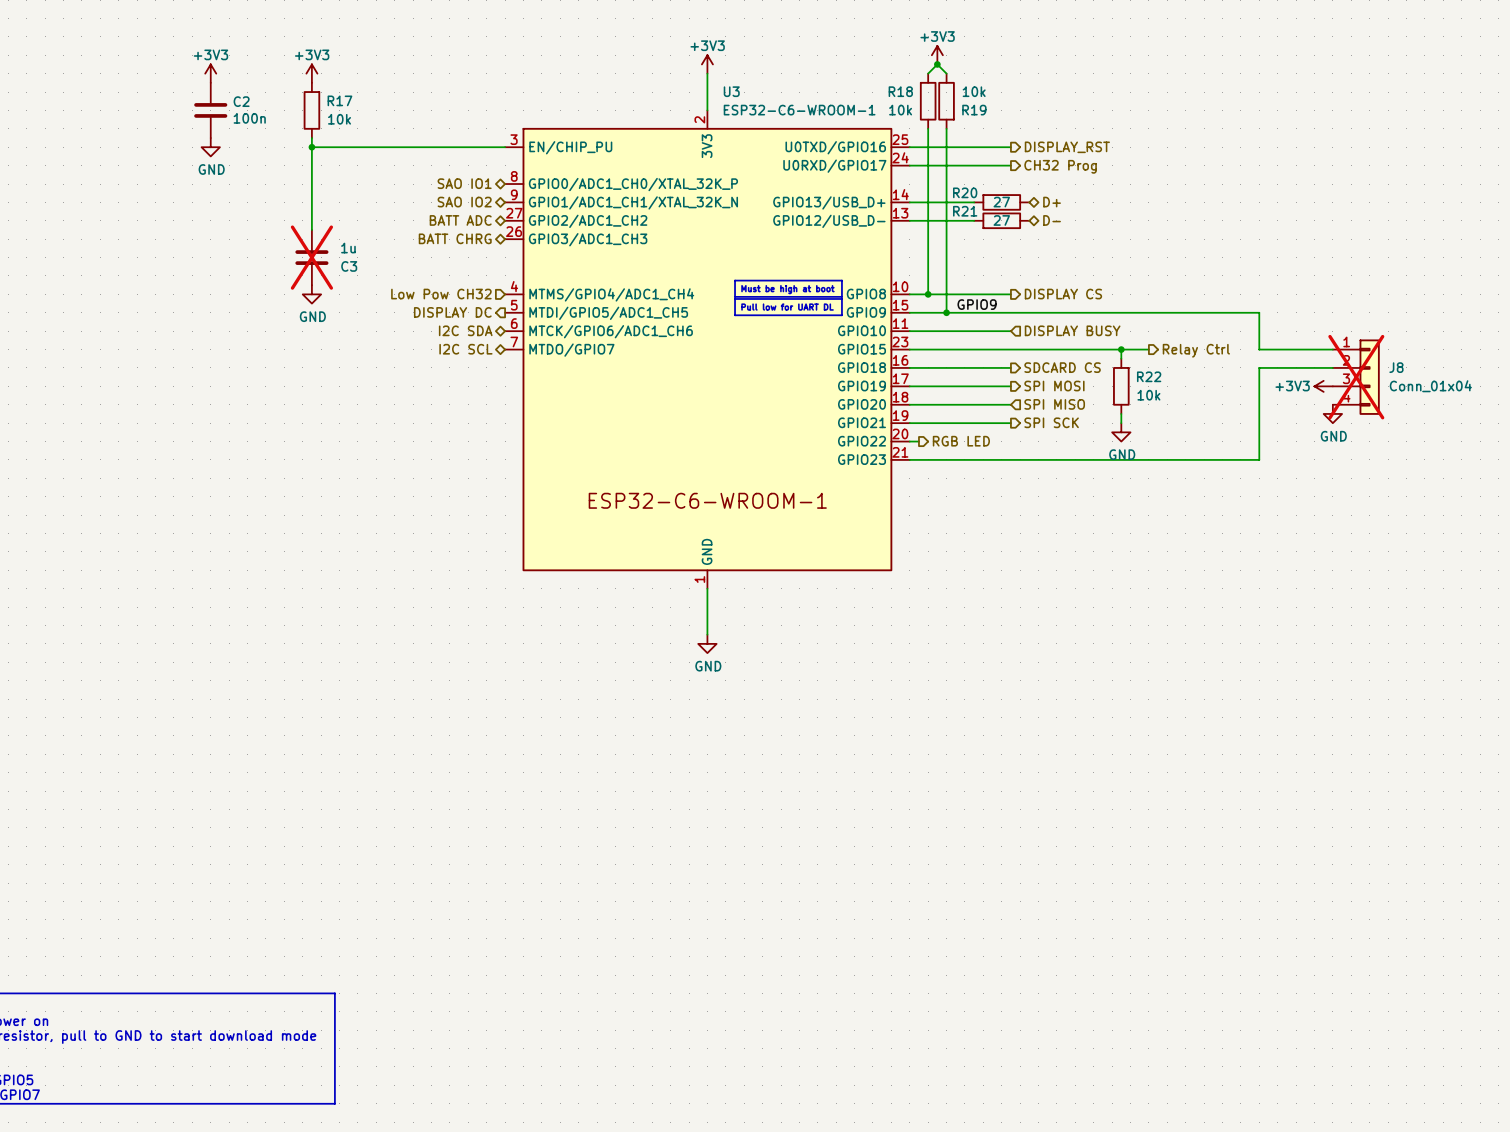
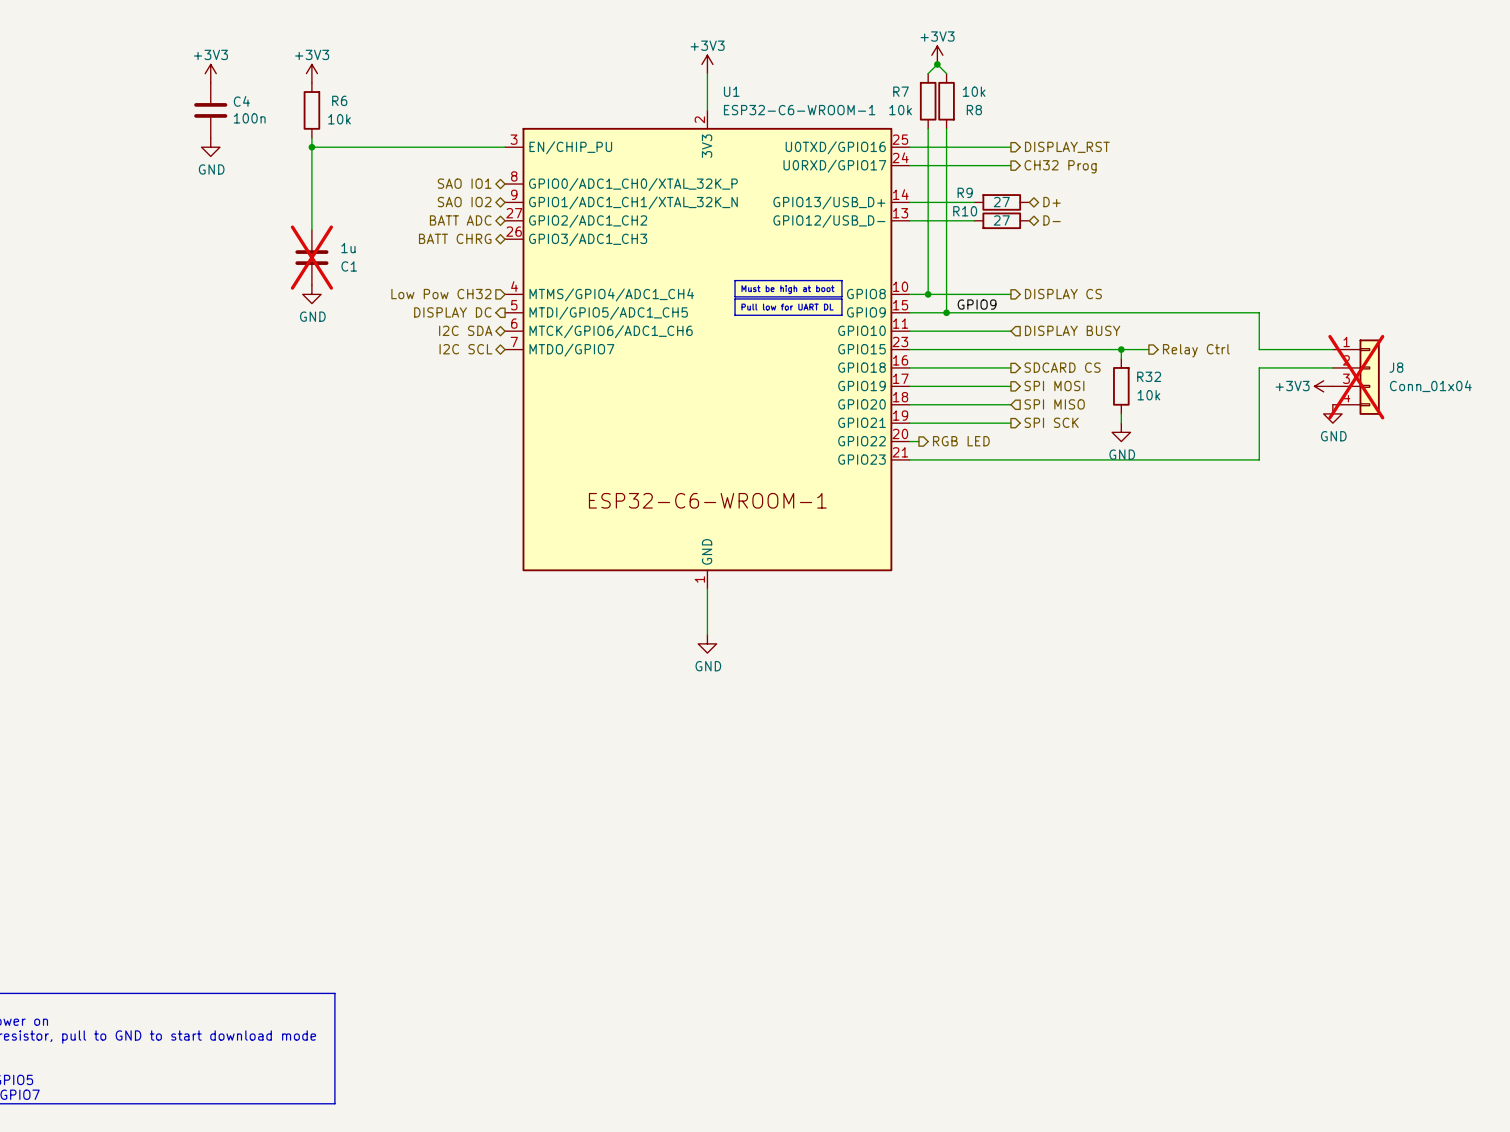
U3 name: U3 (731, 91) -> U1 (731, 91)
R18 name: R18 (900, 91) -> R7 (901, 91)
R17 name: R17 (339, 100) -> R6 (339, 100)
C2 name: C2 (241, 101) -> C4 (241, 101)
R19 name: R19 (974, 110) -> R8 (974, 110)
R20 name: R20 (965, 192) -> R9 (965, 192)
R21 name: R21 (965, 211) -> R10 (965, 211)
C3 name: C3 (349, 266) -> C1 (349, 266)
R22 name: R22 (1149, 376) -> R32 (1149, 376)

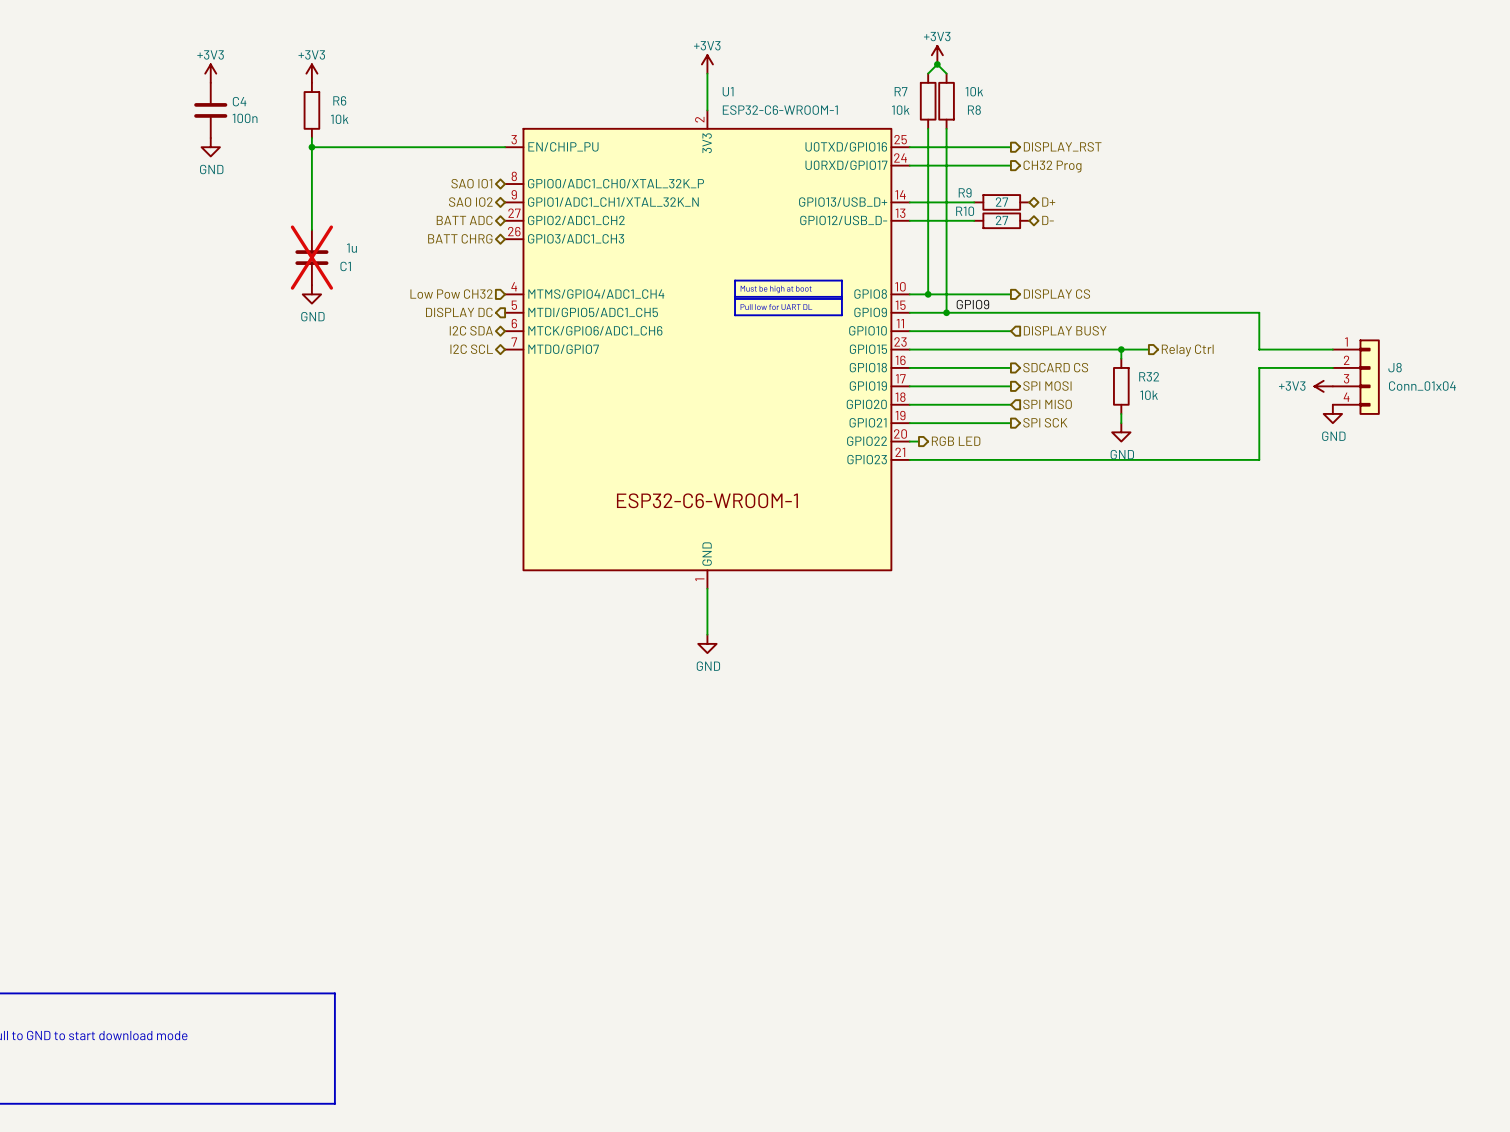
J8 do-not-place cross: (1356, 377) -> none

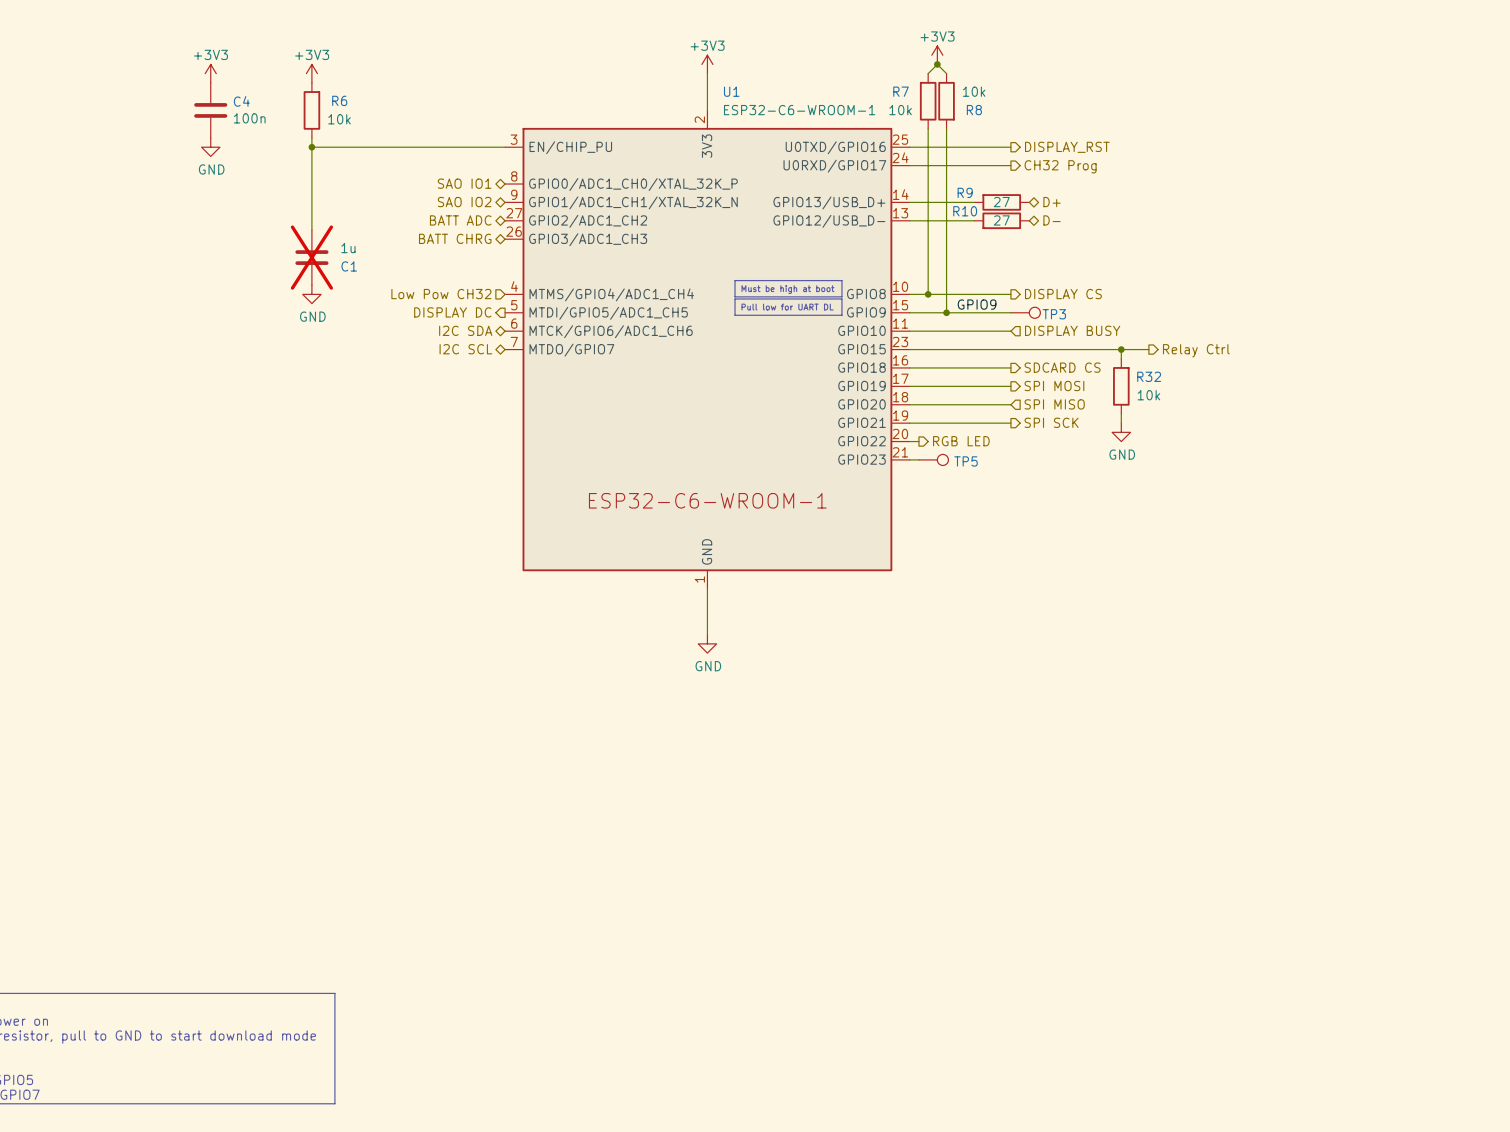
wire: (1010, 312) (1259, 312) (1259, 349) (1332, 349) -> none
TP3: none -> (1025, 312)
wire: (1332, 367) (1259, 367) (1259, 459) (918, 459) -> none
J8: Conn_01x04 (1356, 377) -> none
power symbol: +3V3 (1323, 386) -> none
power symbol: GND (1332, 413) -> none
TP5: none -> (933, 459)

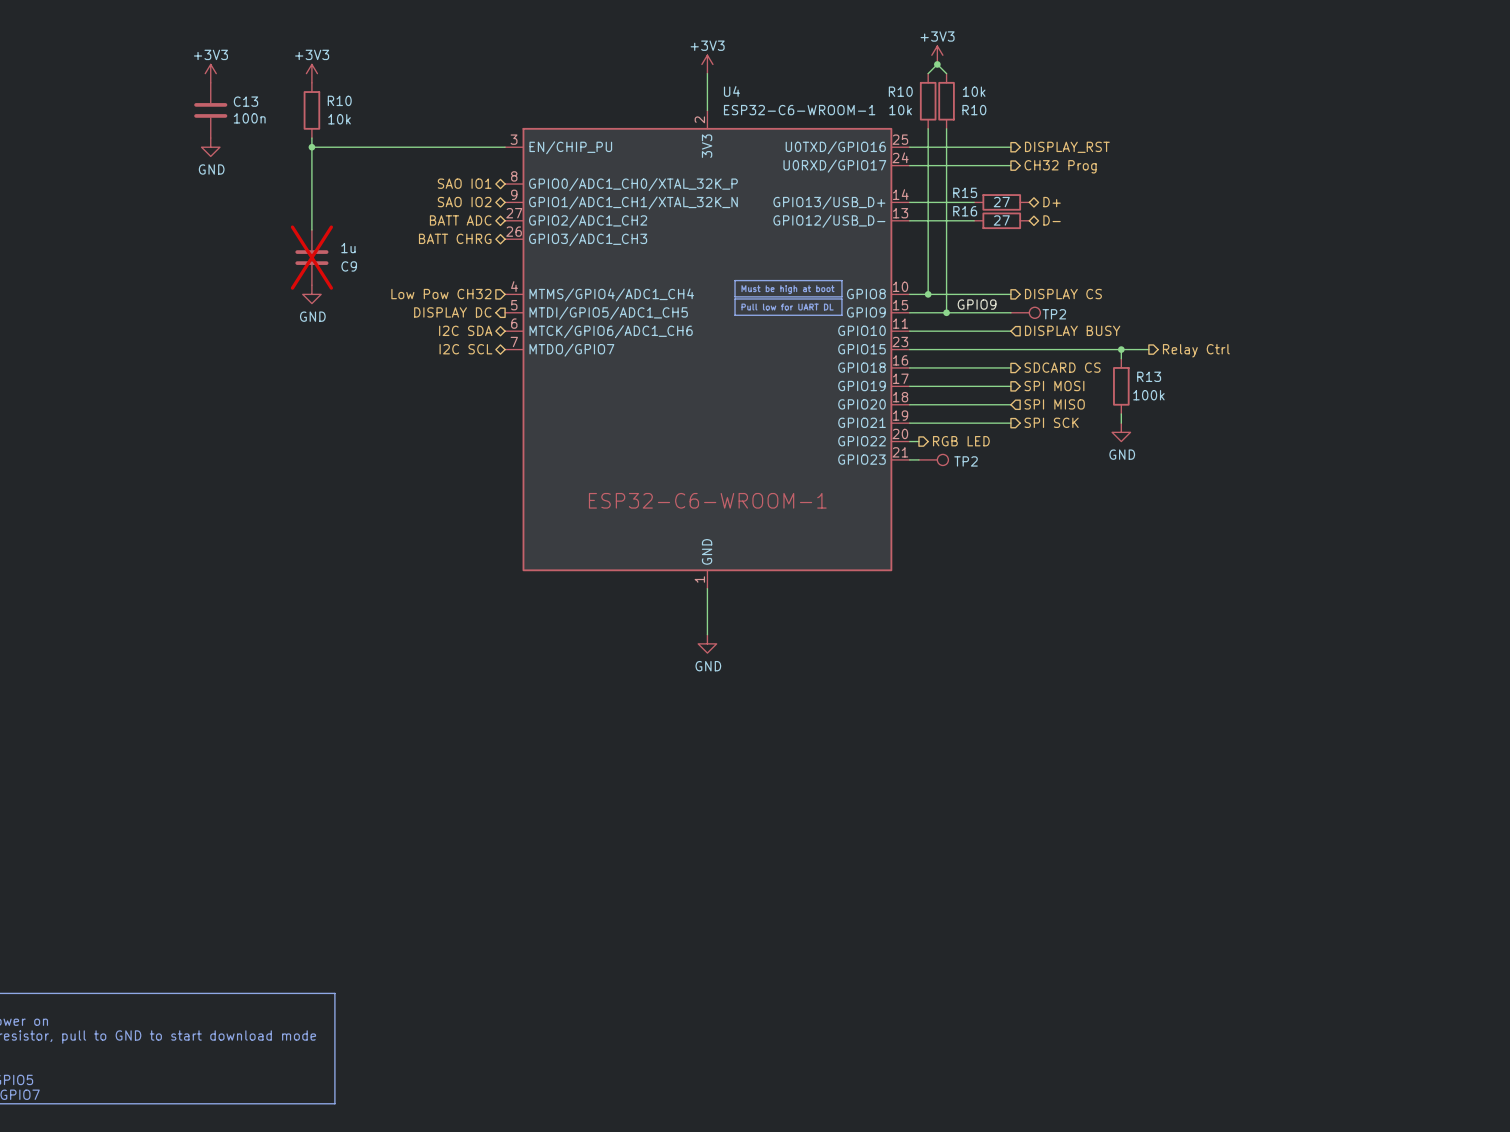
U1 name: U1 (731, 91) -> U4 (731, 91)
R7 name: R7 (901, 91) -> R10 (900, 91)
R6 name: R6 (339, 100) -> R10 (339, 100)
C4 name: C4 (241, 101) -> C13 (245, 101)
R8 name: R8 (974, 110) -> R10 (974, 110)
R9 name: R9 (965, 192) -> R15 (965, 192)
R10 name: R10 (965, 211) -> R16 (965, 211)
C1 name: C1 (349, 266) -> C9 (349, 266)
TP3 name: TP3 (1054, 314) -> TP2 (1054, 314)
R32 name: R32 (1149, 376) -> R13 (1149, 376)
R32 value: 10k (1148, 395) -> 100k (1148, 395)
TP5 name: TP5 (966, 461) -> TP2 (966, 461)

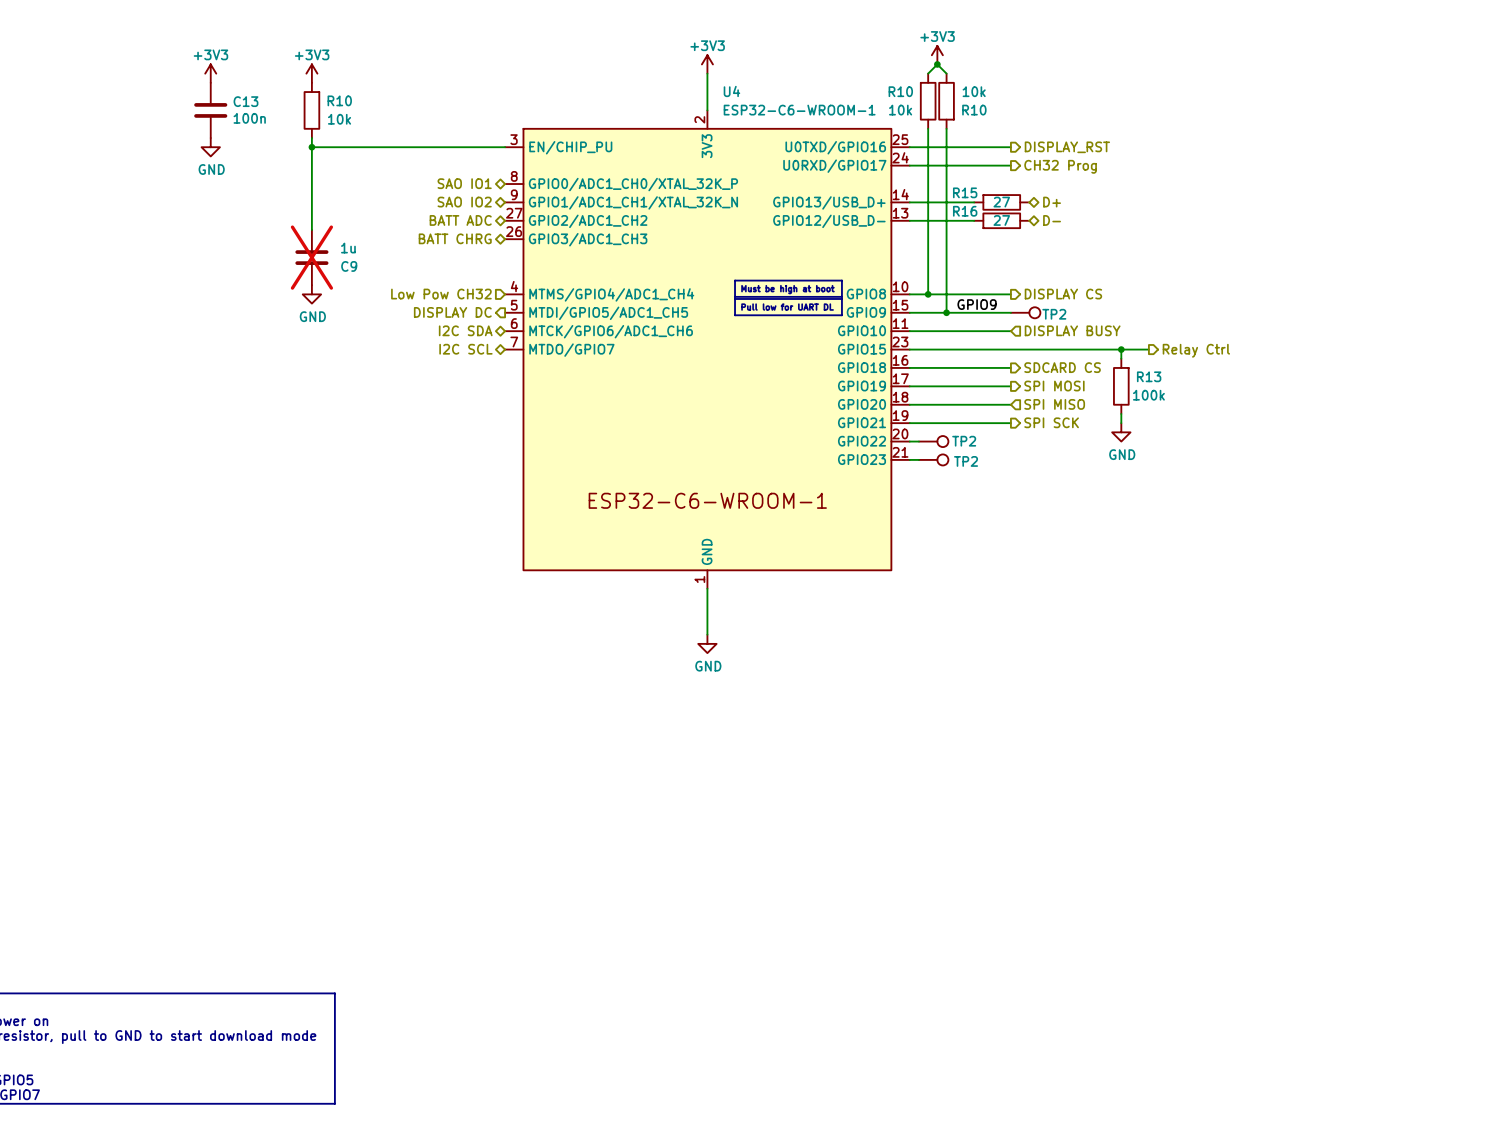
TP2: none -> (933, 441)
hierarchical label: RGB LED (961, 441) -> none

